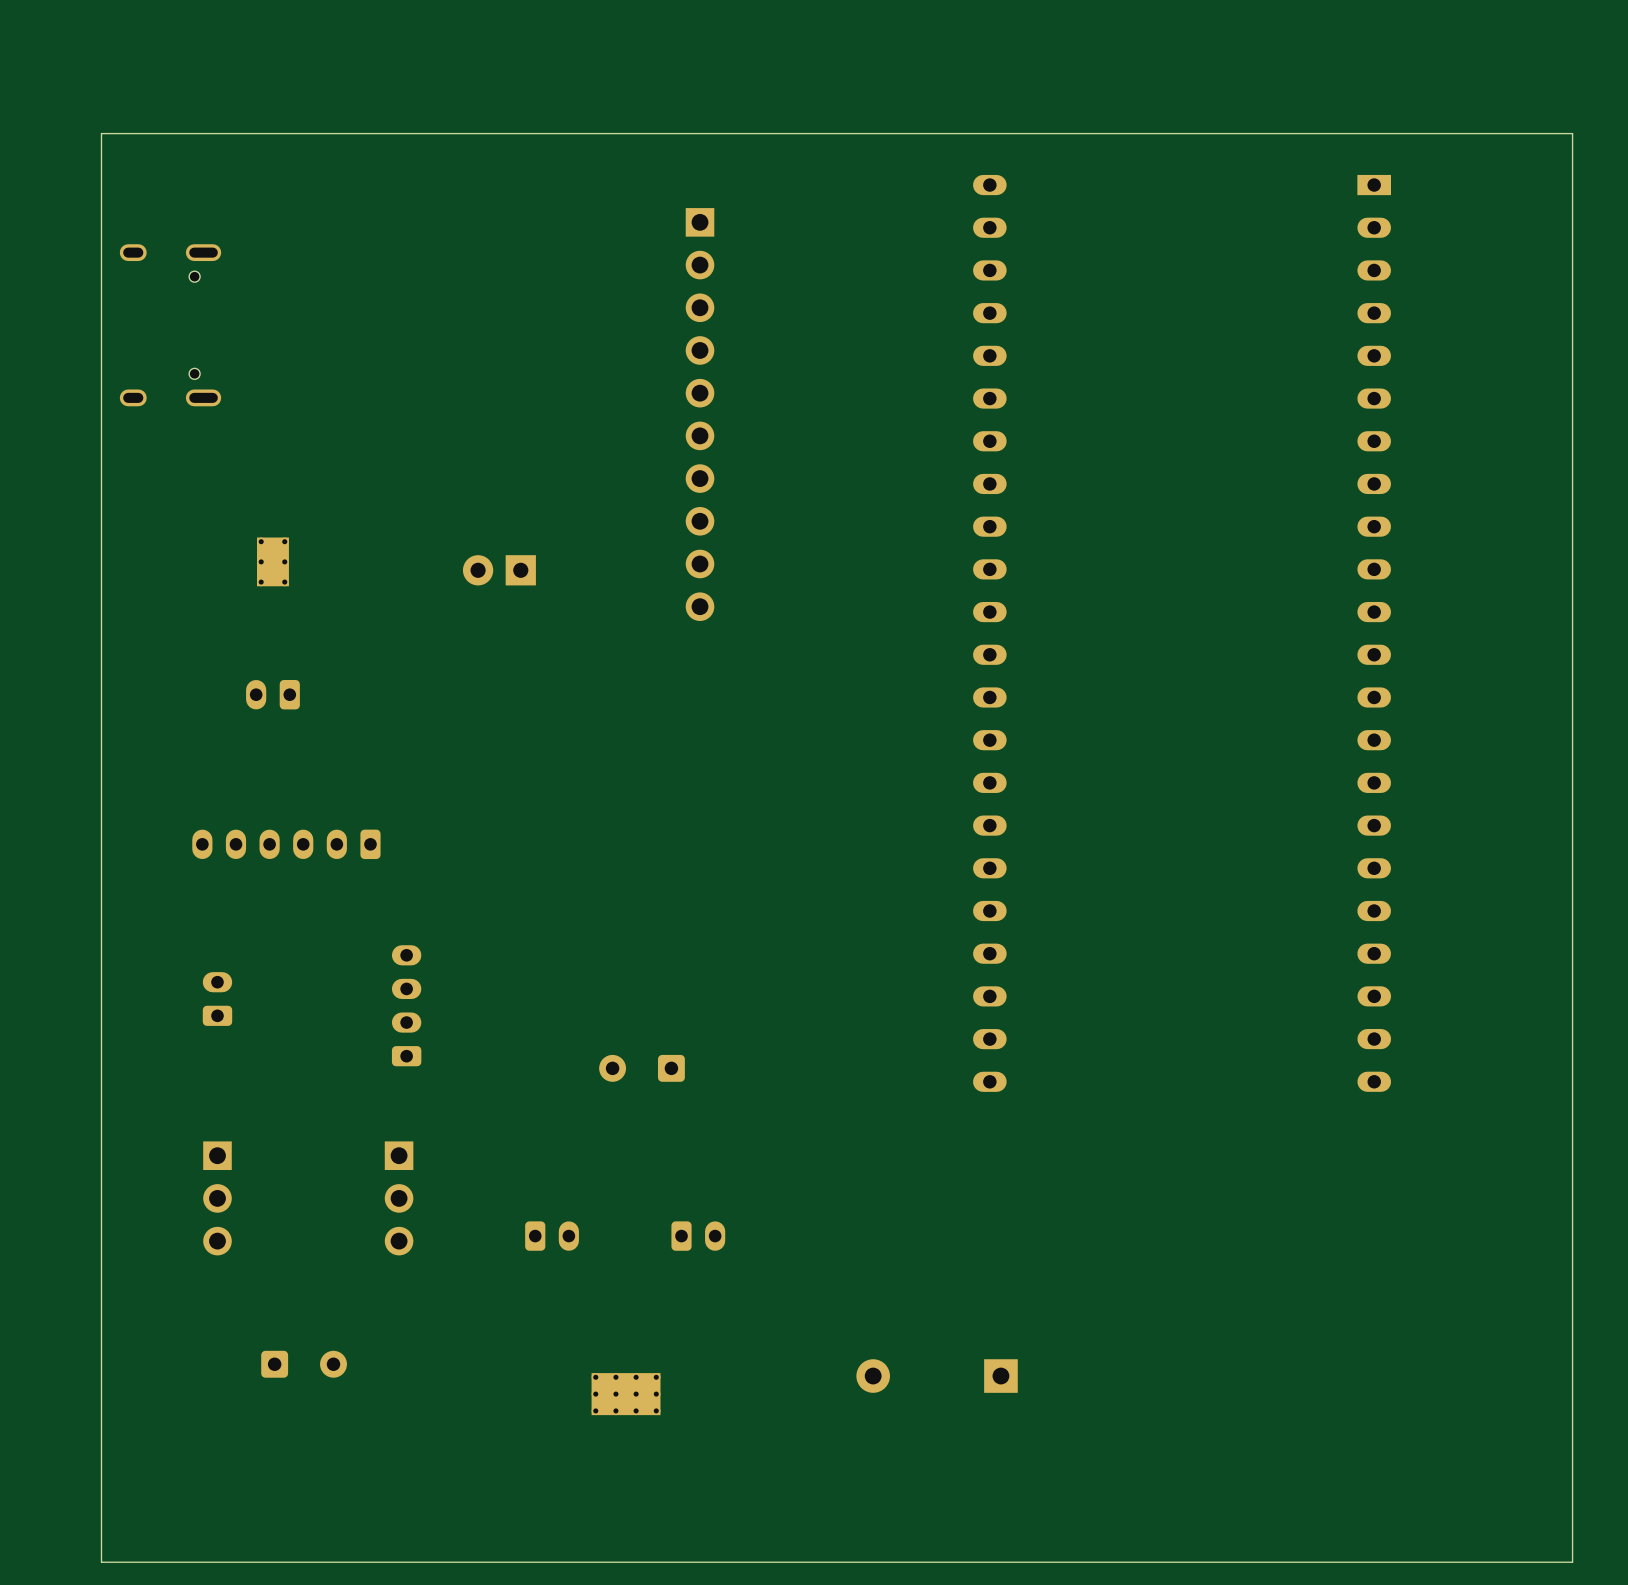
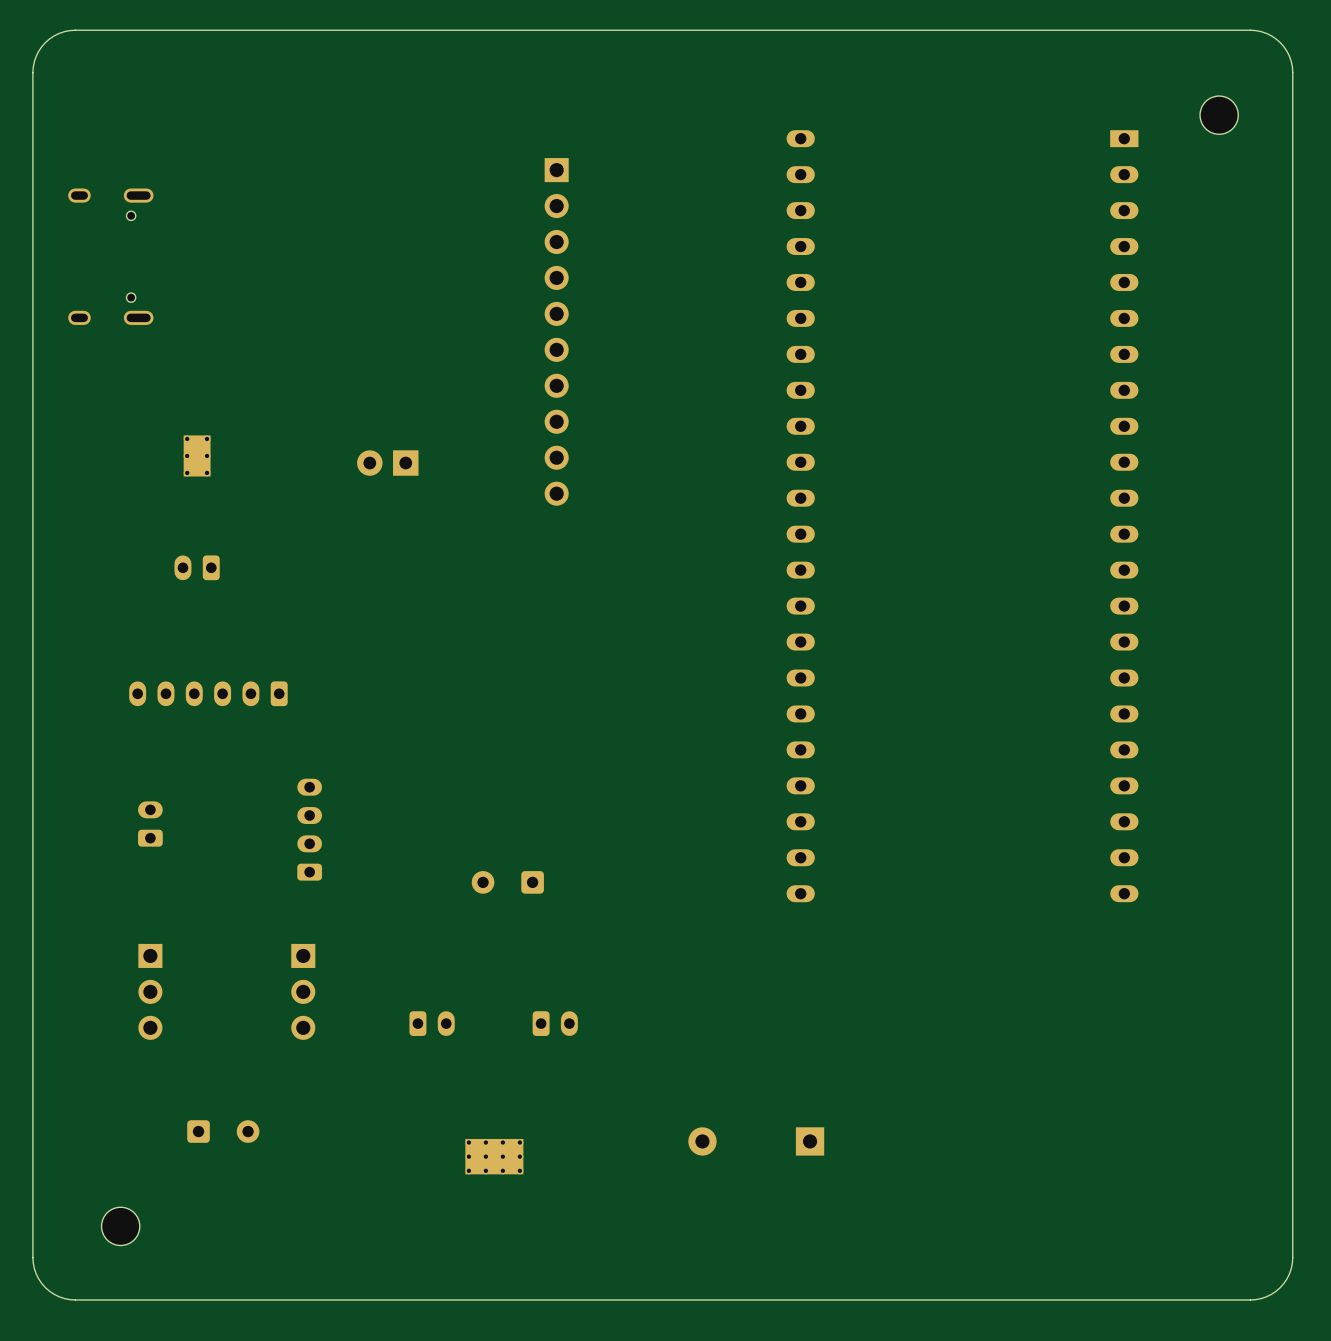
board edge: (1572, 133) (101, 133) (101, 1562) (1572, 1562) (1572, 133) -> (1250, 30) (1266, 33) (1280, 42) (1289, 56) (1292, 72) (1292, 1257) (1289, 1273) (1280, 1287) (1266, 1296) (1250, 1299) (75, 1299) (59, 1296) (45, 1287) (36, 1273) (32, 1257) (32, 72) (36, 56) (45, 42) (59, 33) (75, 30) (1250, 30)
part: none -> (1219, 115)
part: none -> (120, 1226)

